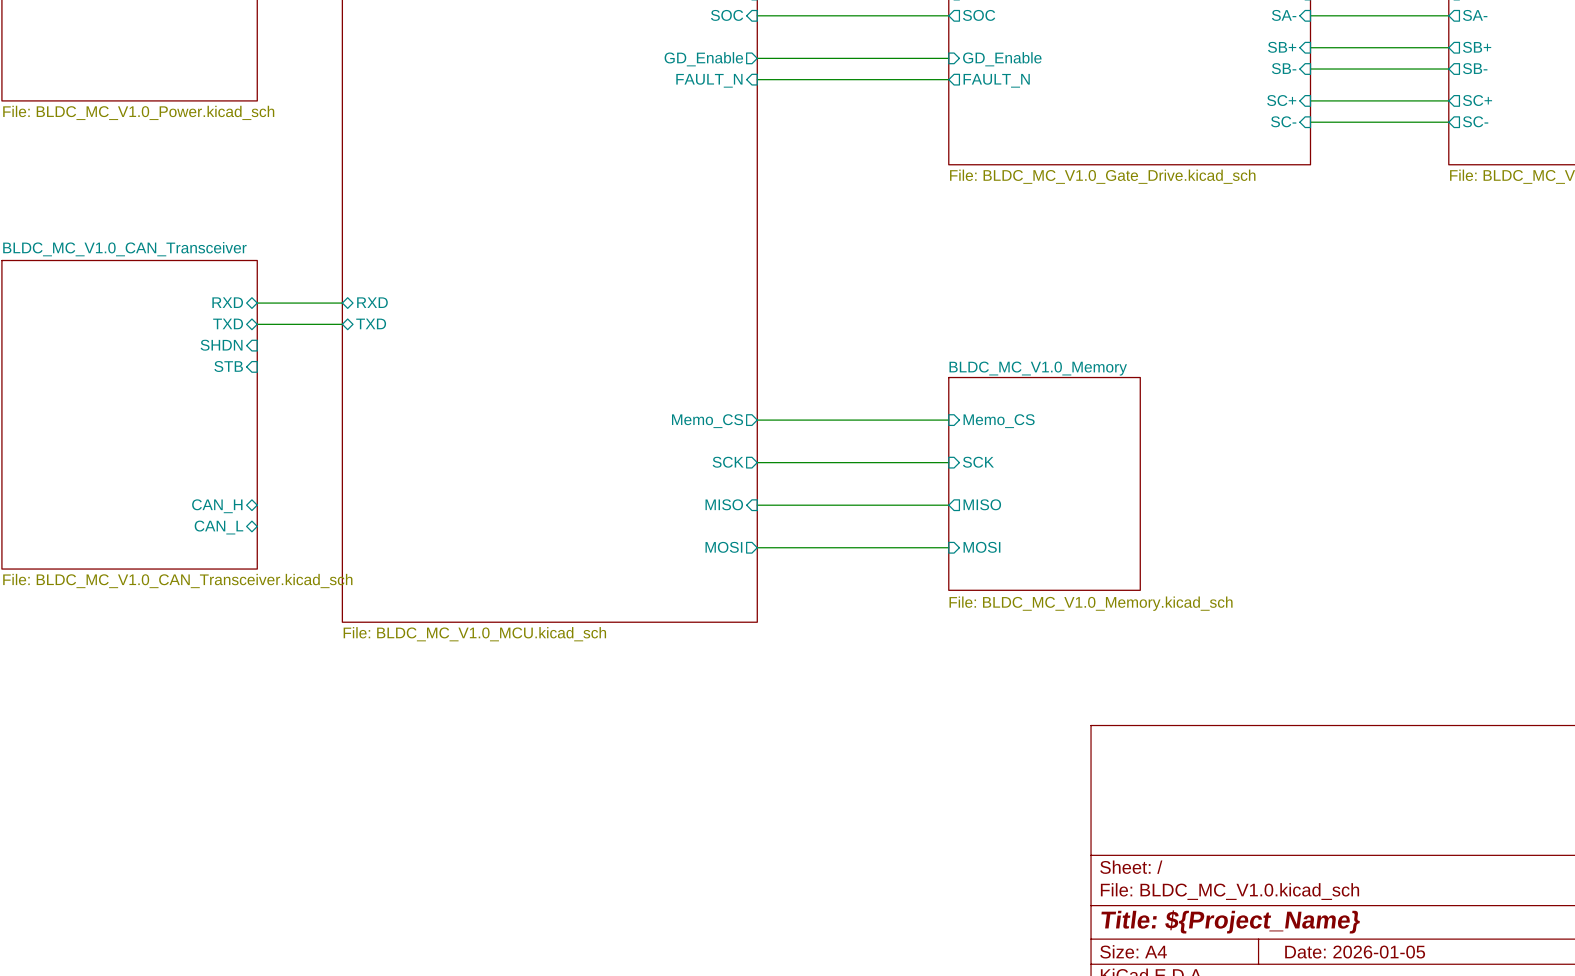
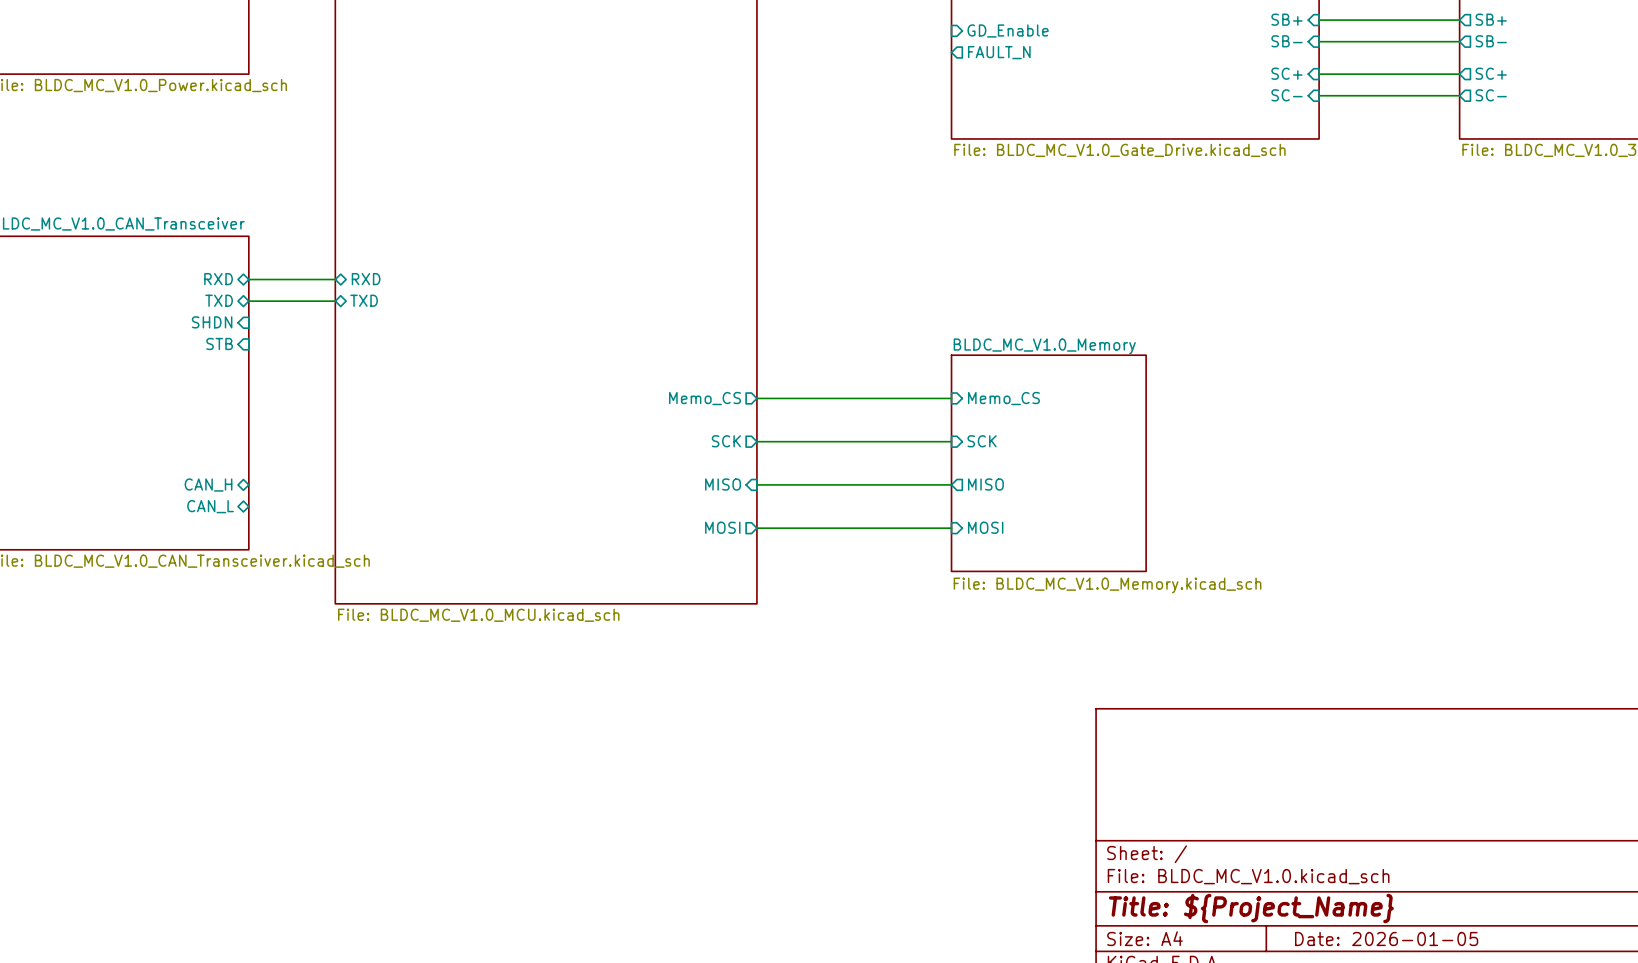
wire: (757, 58) (948, 58) -> none
sheet pin: GD_Enable (703, 59) -> none
wire: (757, 79) (948, 79) -> none
sheet pin: FAULT_N (709, 80) -> none

